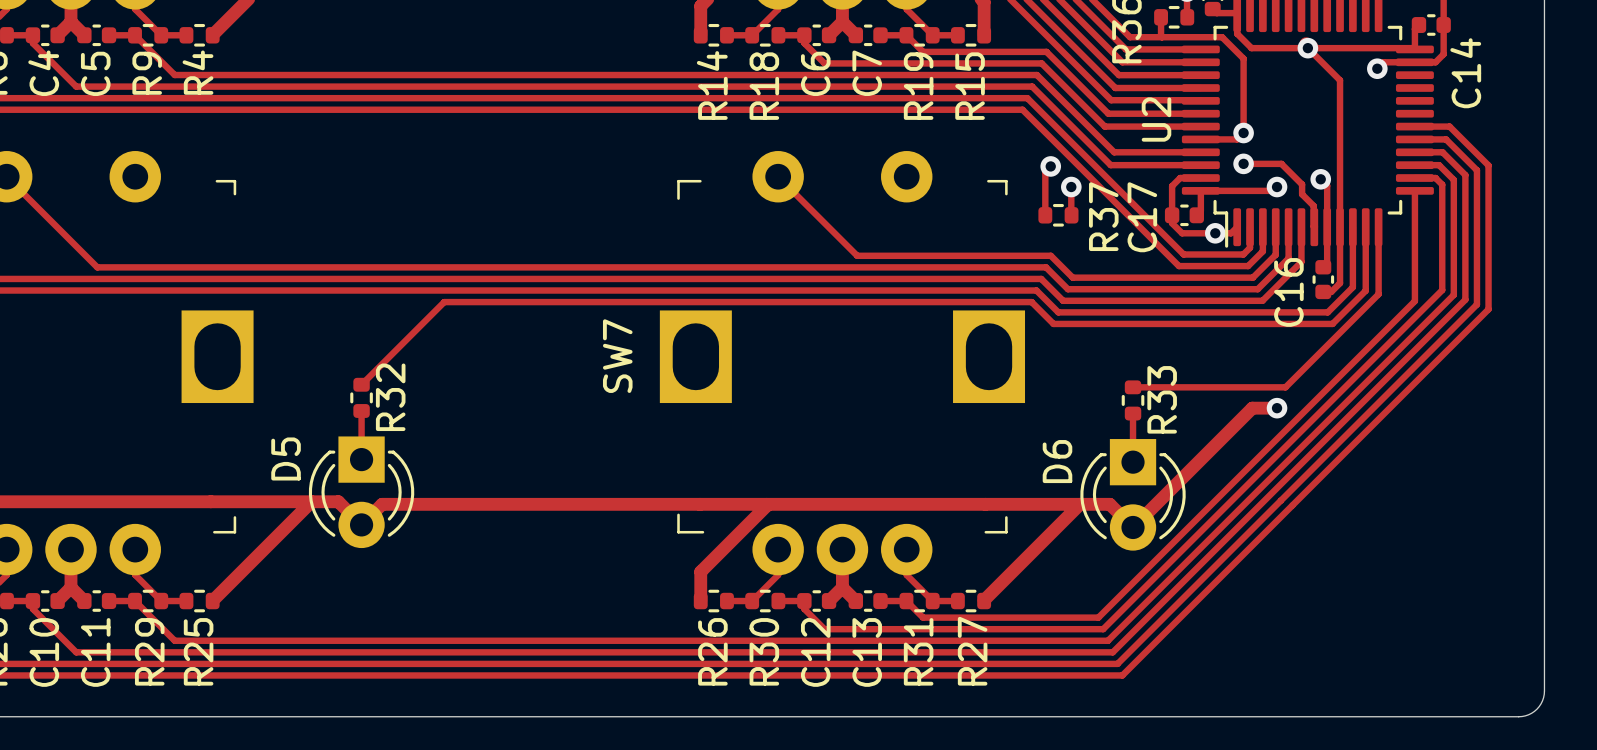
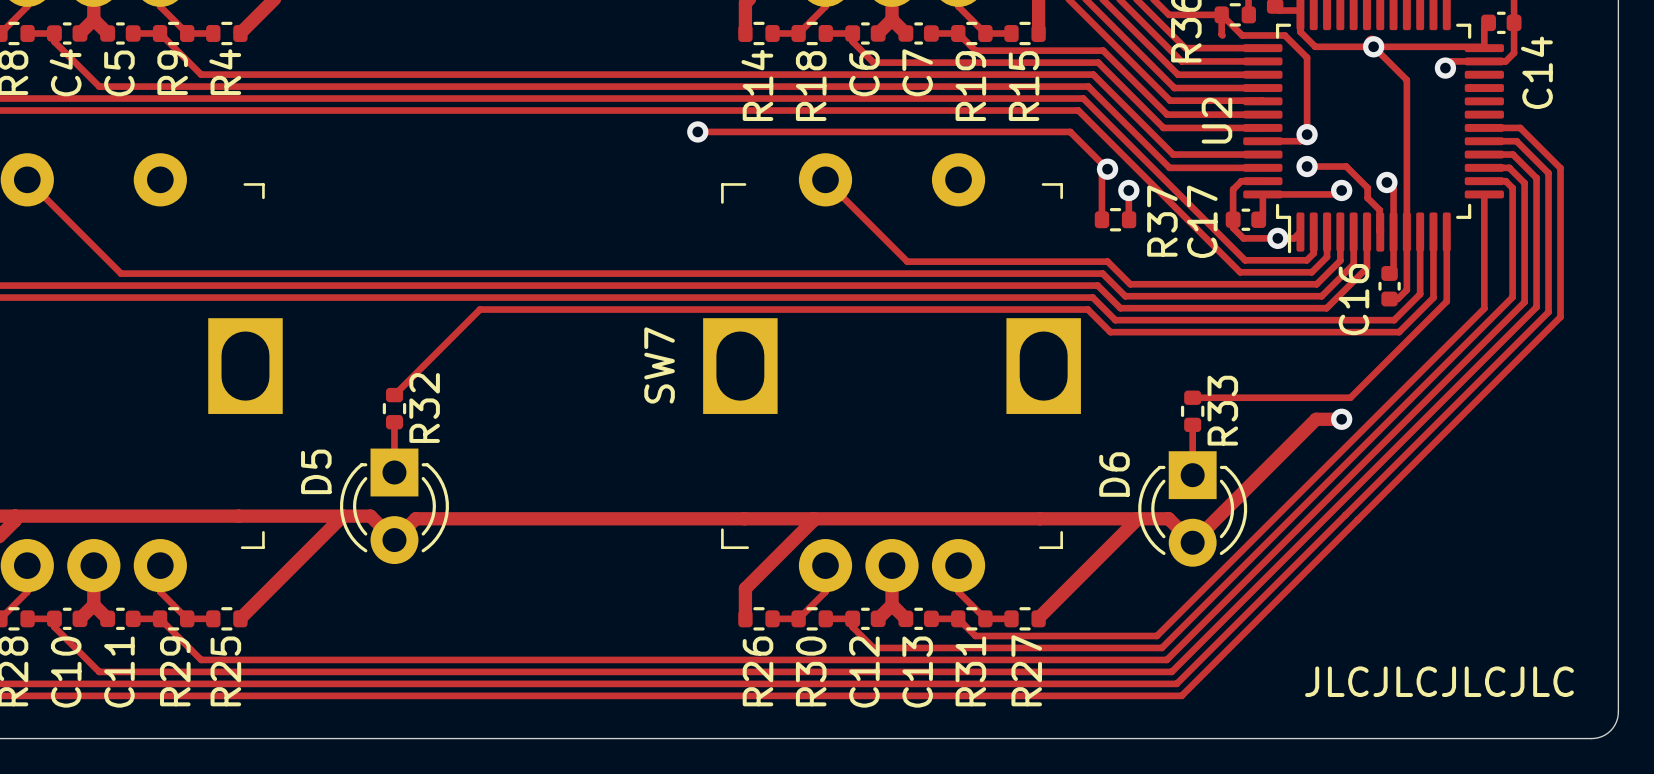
track: (1110, 17) (1130, 37) (1180, 37) -> (1169, 14) (1221, 14) (1242, 35)
track: none -> (697, 131) (1070, 131) (1107, 169)
via: none -> (697, 131)
text: none -> JLCJLCJLCJLC (1439, 681)

